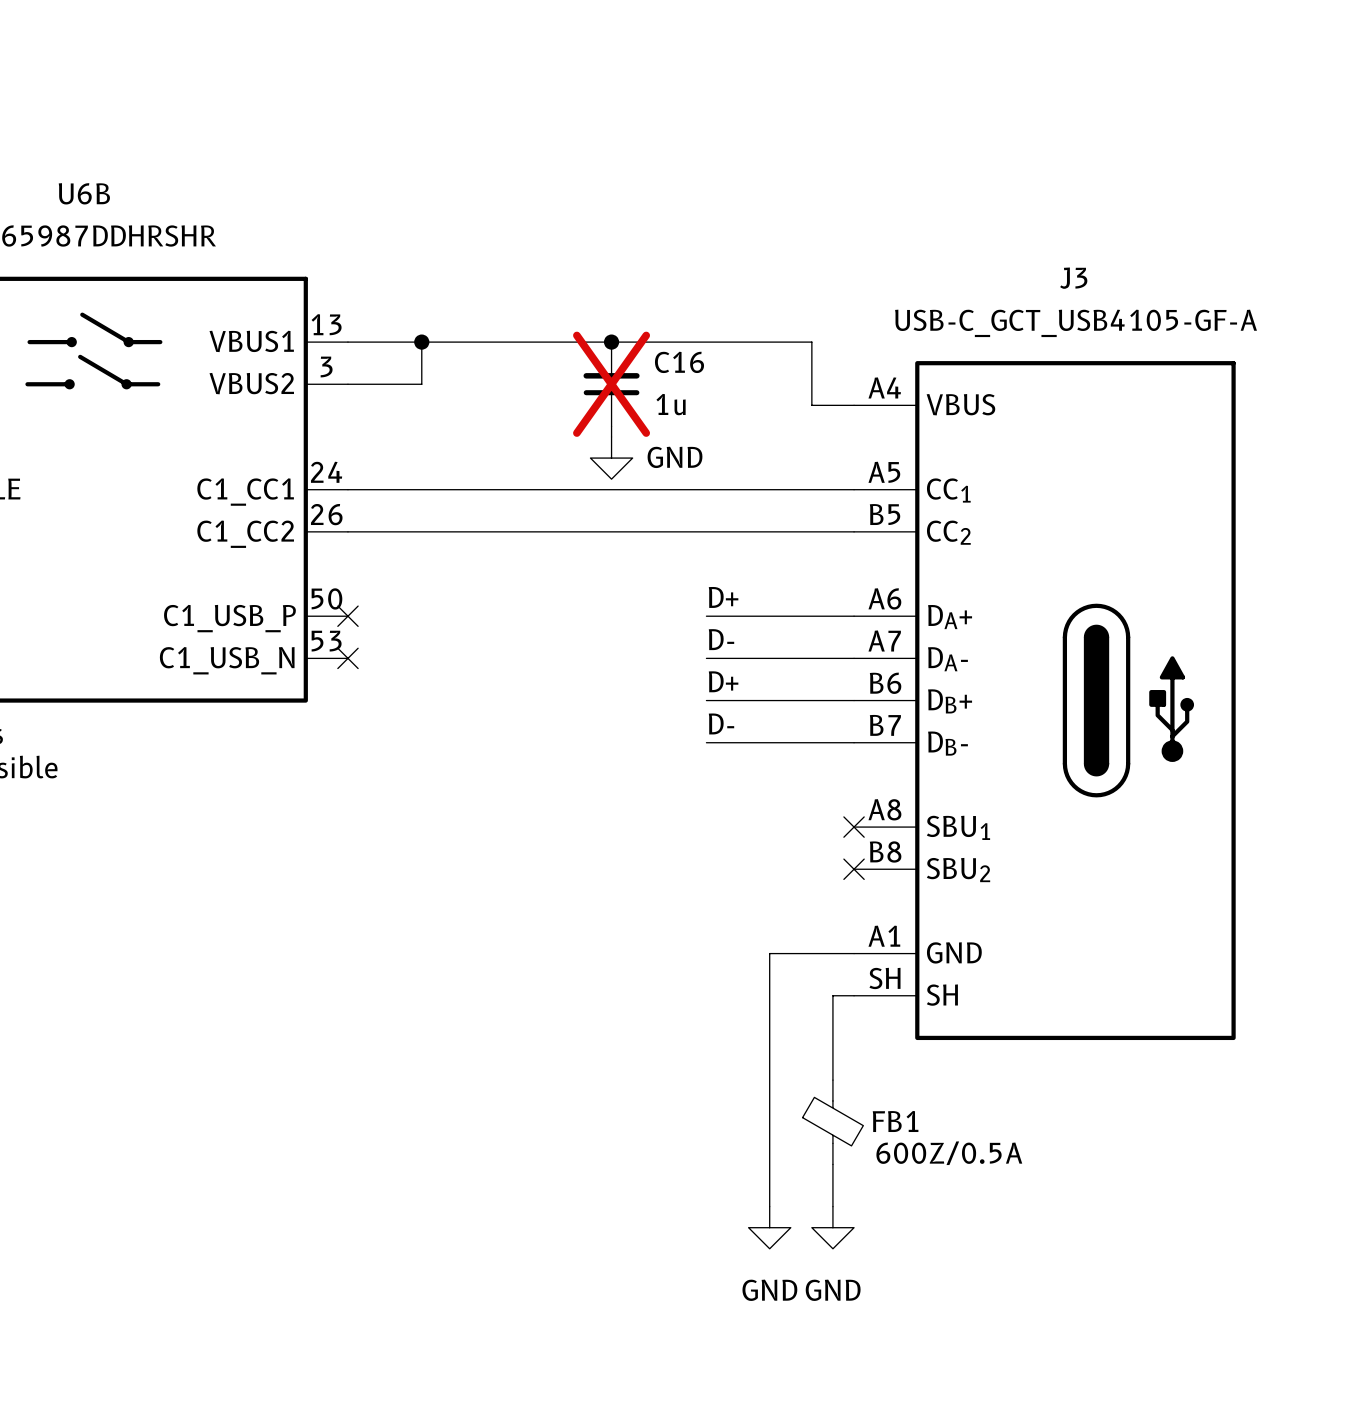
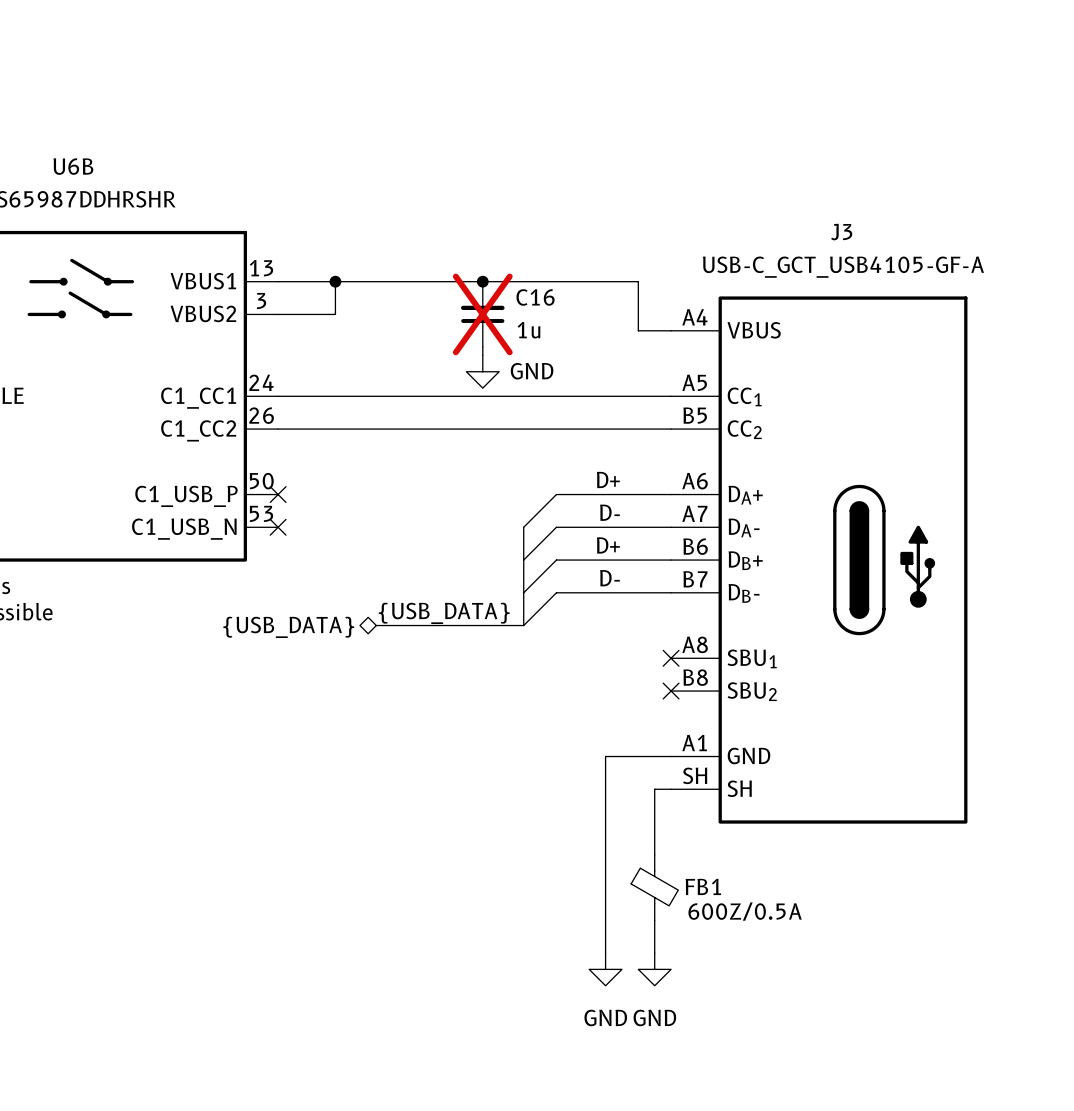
label position: D+ (723, 597) -> D+ (608, 479)
wire: none -> (556, 494) (523, 527)
label position: D- (721, 639) -> D- (609, 512)
bus: none -> (523, 527) (523, 625) (376, 625)
wire: none -> (556, 527) (523, 560)
label position: D+ (723, 681) -> D+ (608, 545)
wire: none -> (556, 560) (523, 592)
label position: D- (721, 723) -> D- (609, 578)
wire: none -> (556, 592) (523, 625)
label: none -> {USB_DATA} (444, 613)
hierarchical label: none -> {USB_DATA} (288, 627)

